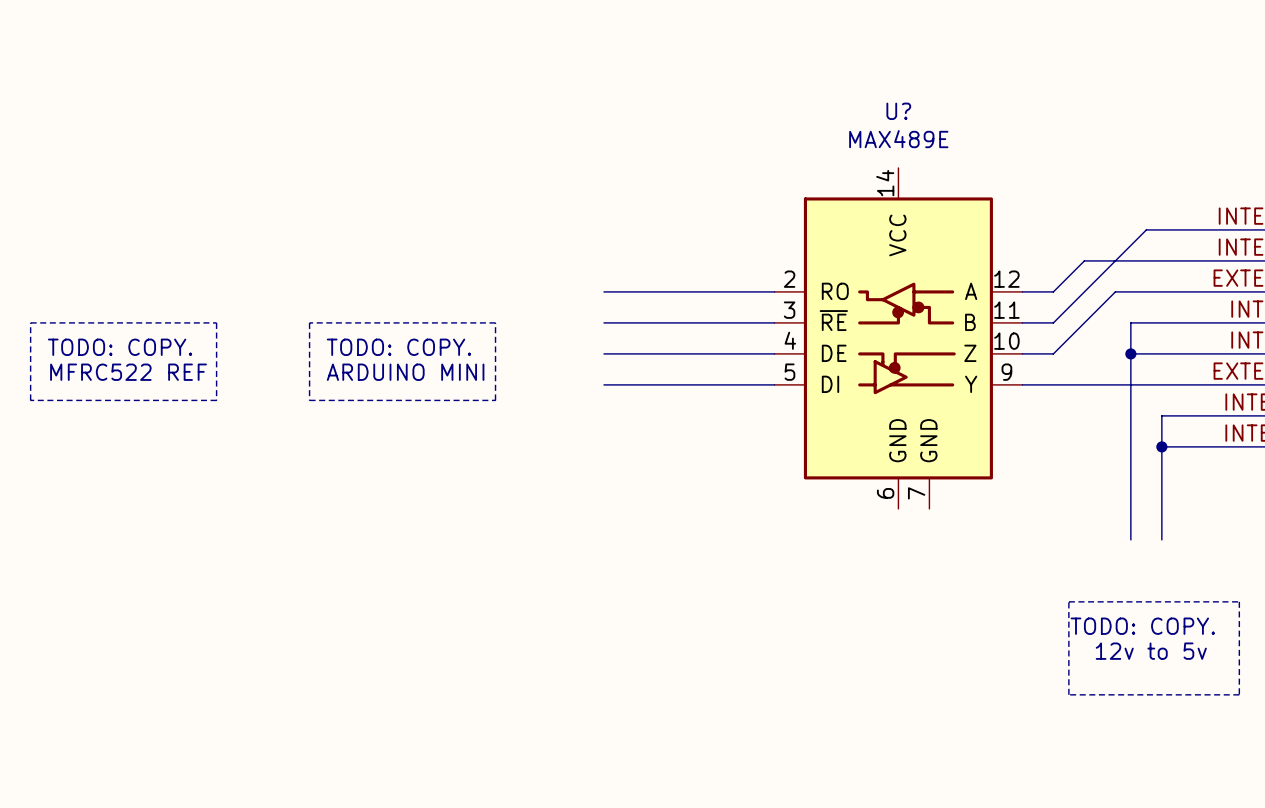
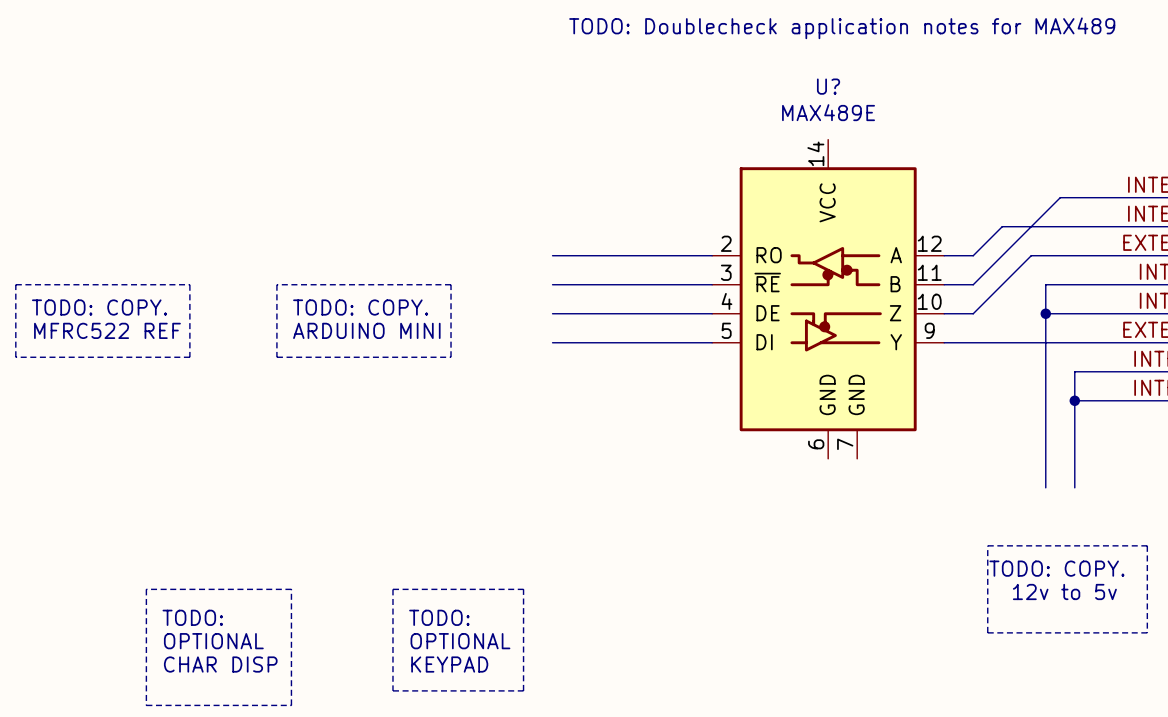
text: none -> TODO: Doublecheck application notes for MAX489 (842, 28)
line: none -> (146, 589) (146, 705) (291, 705) (291, 589) (146, 589)
line: none -> (392, 589) (523, 589) (523, 690) (392, 690) (392, 589)
text: none -> TODO: (192, 617)
text: none -> TODO: (439, 617)
text: none -> OPTIONAL (213, 641)
text: none -> OPTIONAL (460, 641)
text: none -> CHAR DISP (220, 664)
text: none -> KEYPAD (449, 664)

